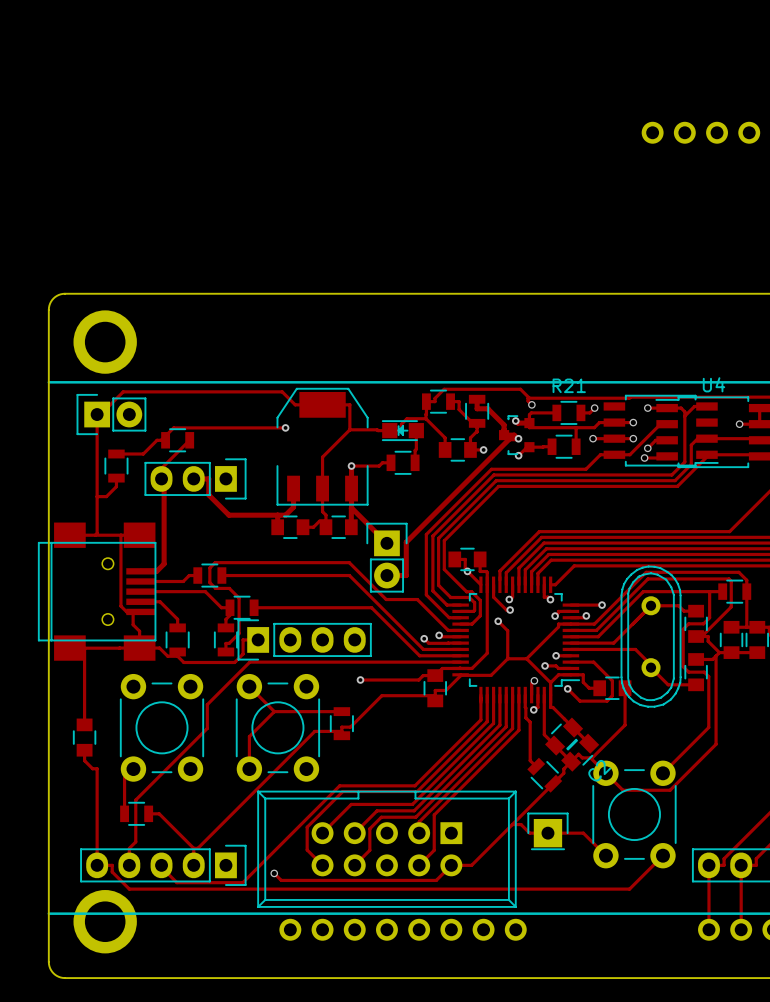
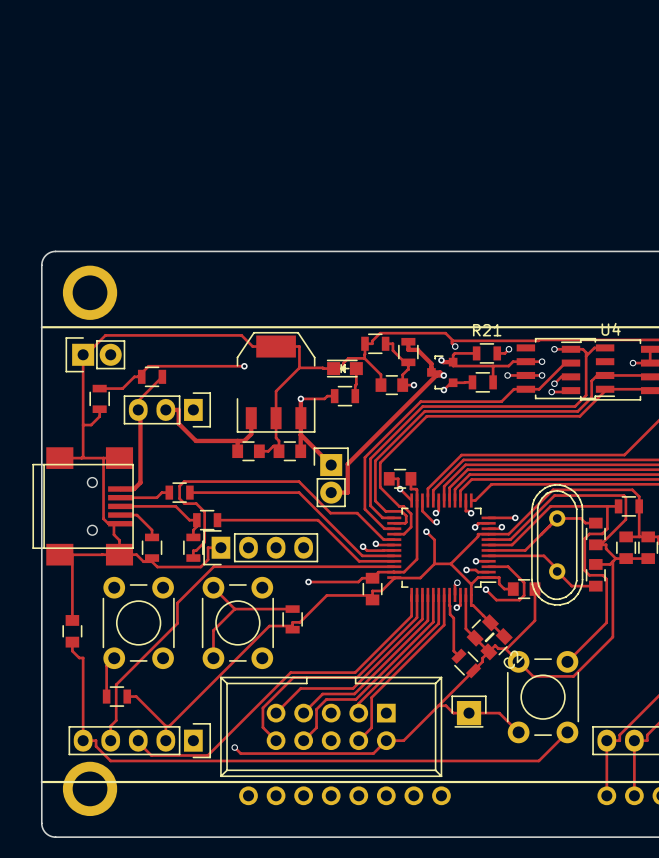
part: (652, 132) -> none
part: (684, 132) -> none
part: (717, 132) -> none
part: (749, 132) -> none

